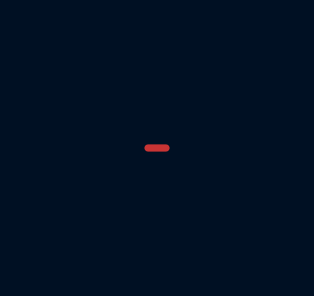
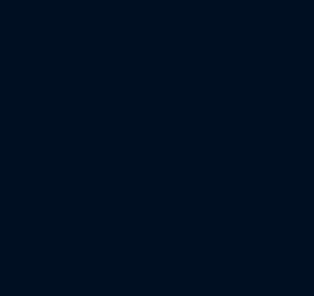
top track: (147, 147) (166, 147) -> none

